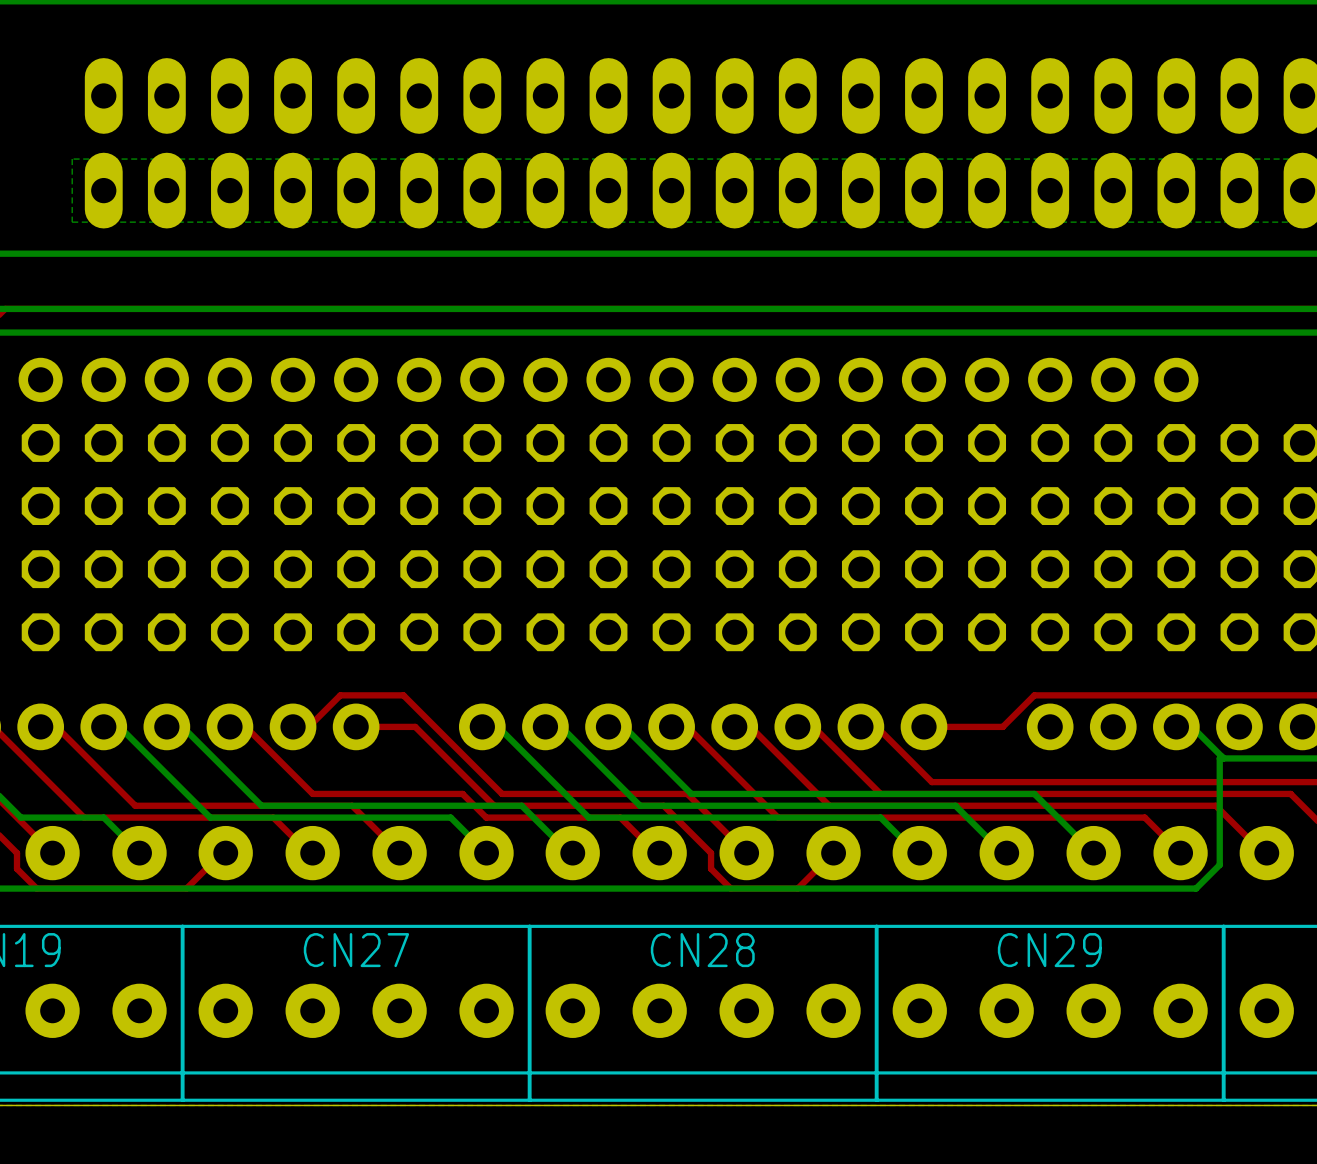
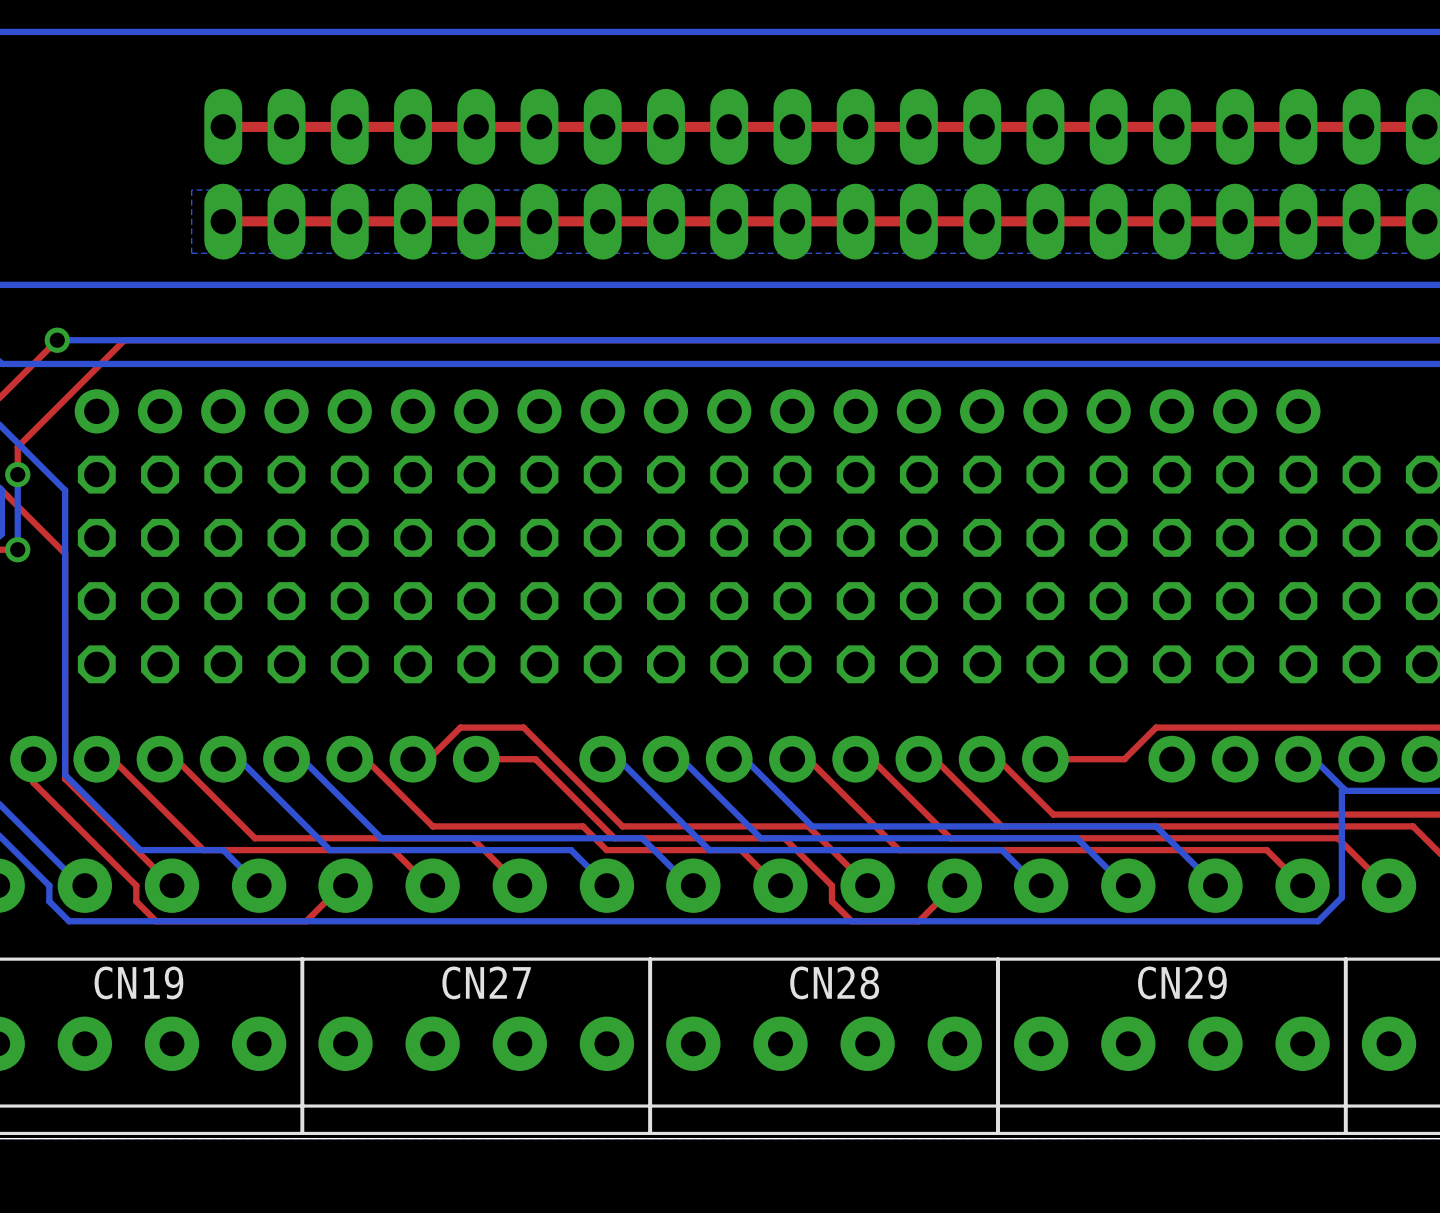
top track: none -> (222, 126) (1426, 126) (1426, 129)
top track: none -> (1423, 221) (222, 221) (222, 223)

